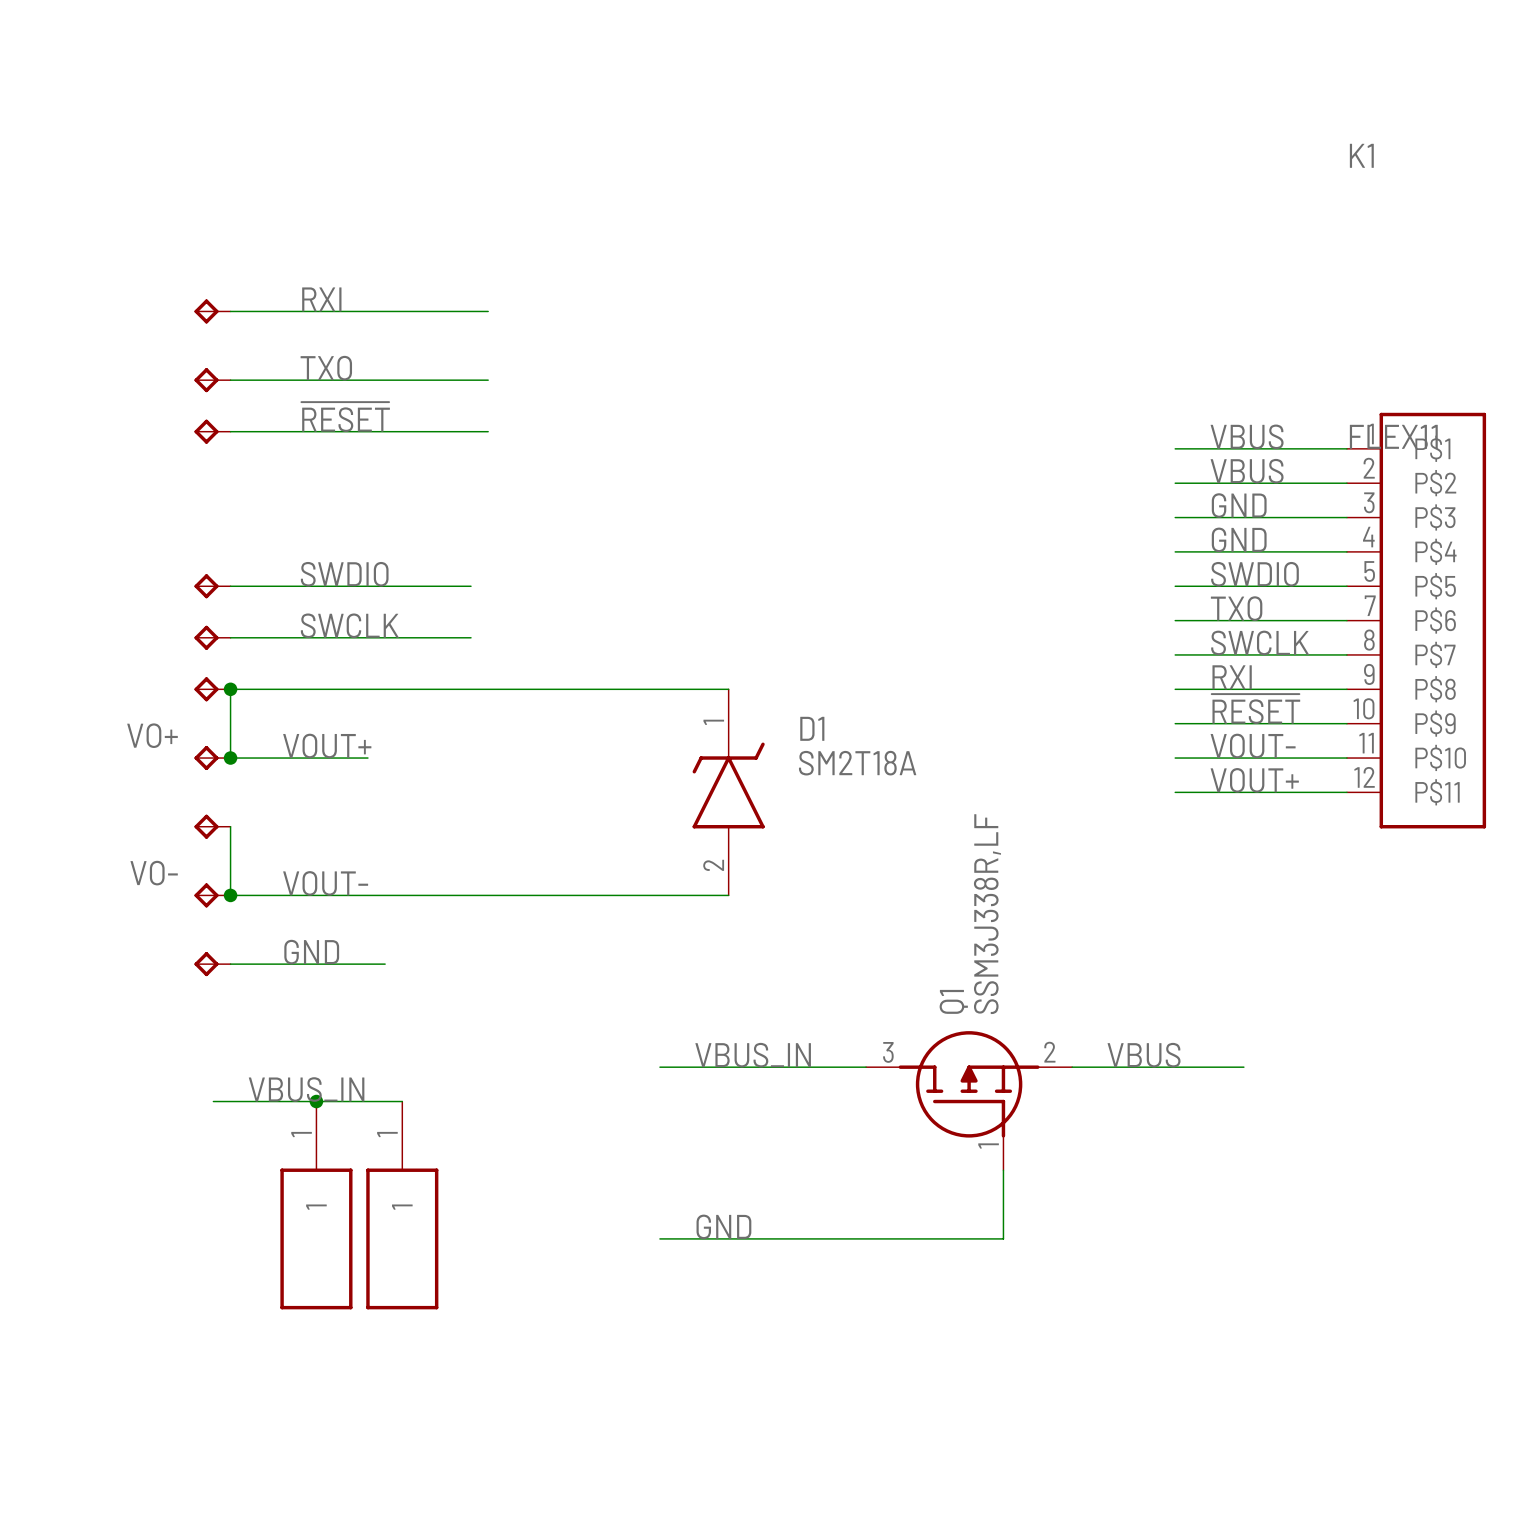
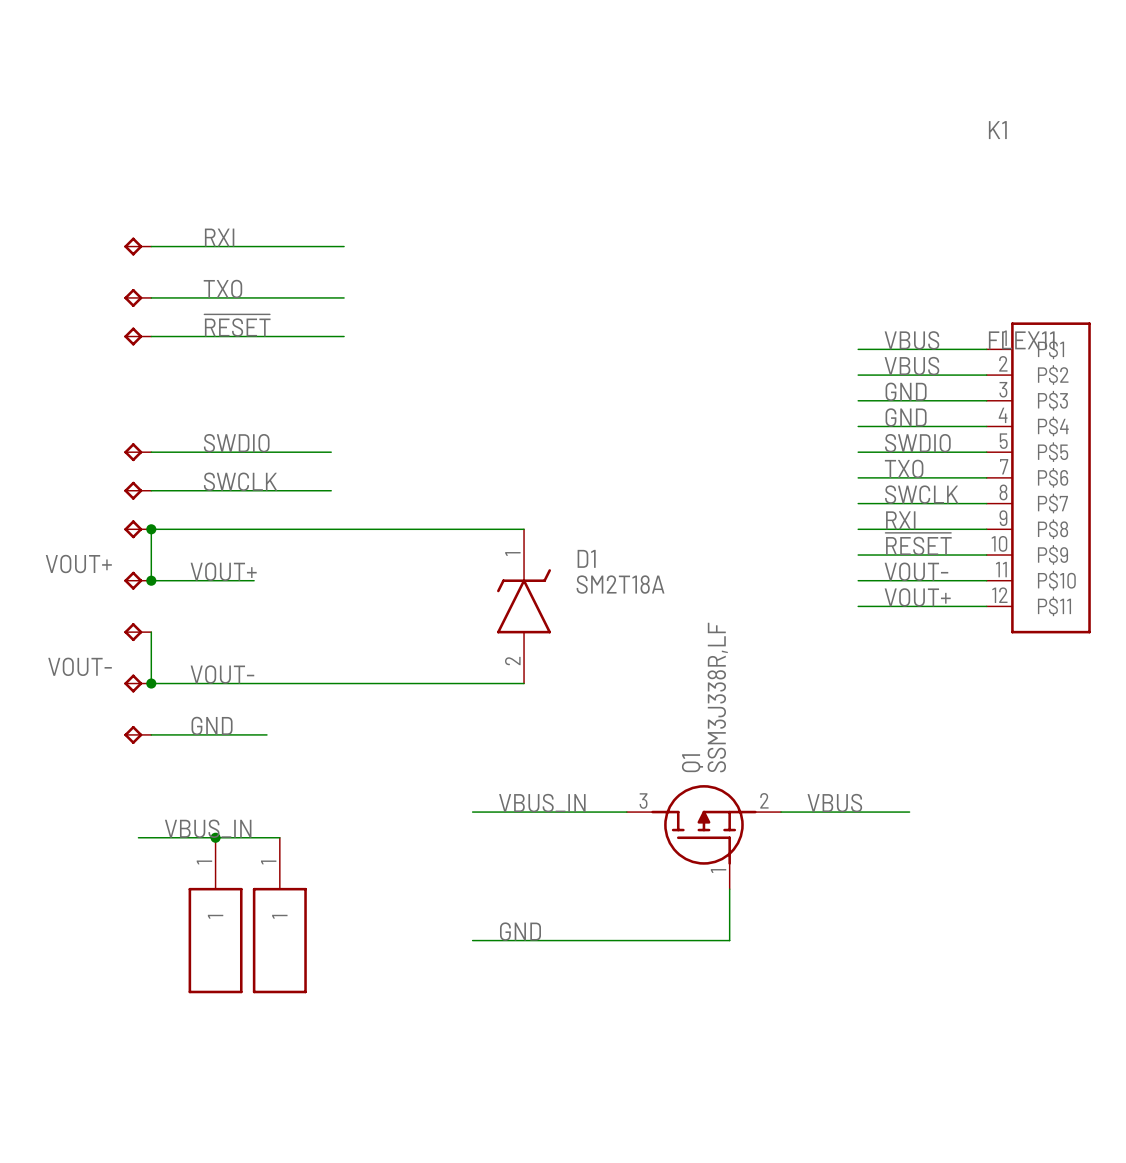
VO+ name: VO+ (152, 735) -> VOUT+ (78, 564)
VO- name: VO- (154, 873) -> VOUT- (80, 666)

